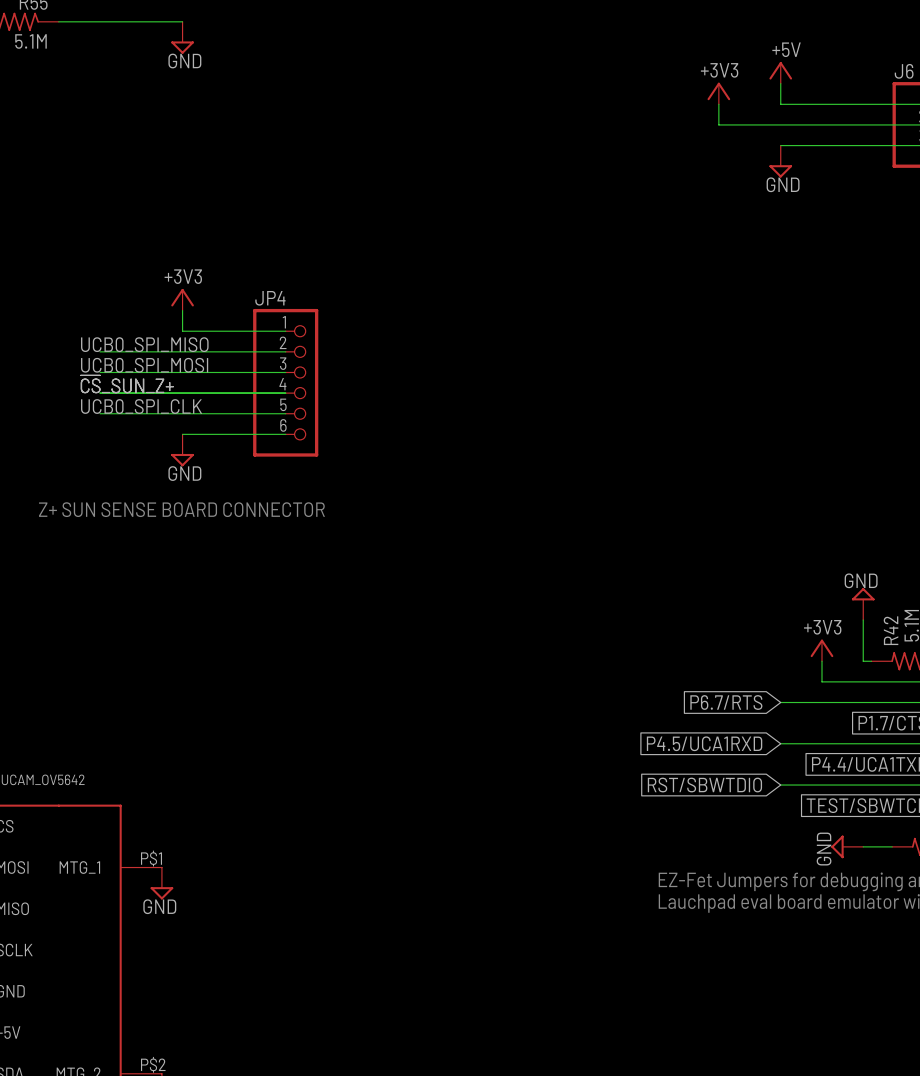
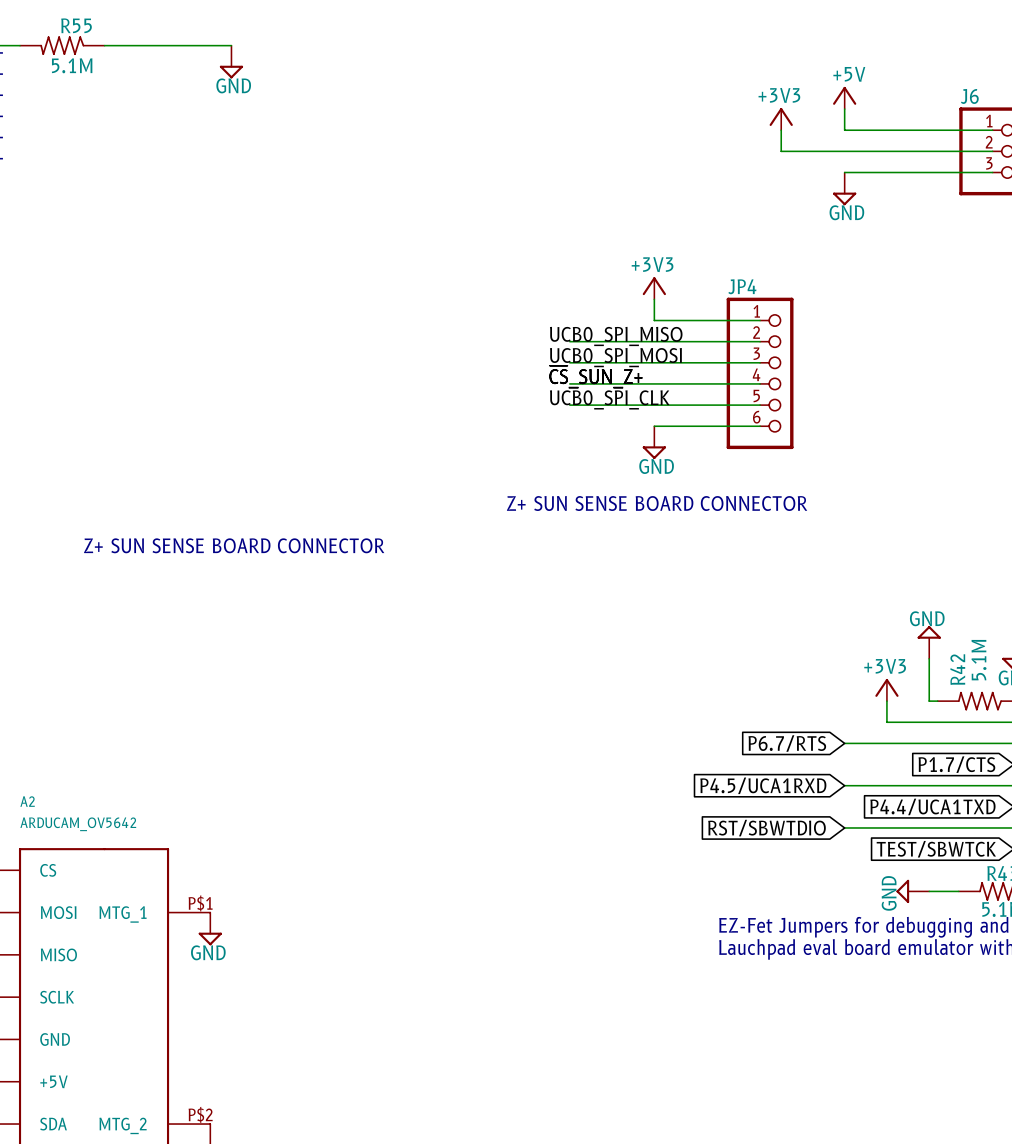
power symbol: none -> +3V3 (654, 288)
wire: none -> (654, 299) (654, 320) (760, 320)
power symbol: +3V3 (182, 299) -> none
label: none -> UCB0_SPI_MISO (616, 336)
wire: (182, 310) (182, 331) (285, 331) -> none
wire: none -> (569, 341) (760, 341)
label: none -> UCB0_SPI_MOSI (615, 357)
wire: none -> (569, 362) (760, 362)
label: none -> ~{CS}_SUN_Z+ (595, 377)
label: UCB0_SPI_MISO (144, 344) -> none
wire: (100, 351) (285, 351) -> none
wire: none -> (569, 383) (760, 383)
label: UCB0_SPI_MOSI (144, 365) -> none
label: none -> UCB0_SPI_CLK (609, 399)
wire: (100, 372) (285, 372) -> none
wire: none -> (569, 405) (760, 405)
JP4 position: (285, 382) -> (760, 373)
label: ~{CS}_SUN_Z+ (127, 384) -> none
wire: (100, 393) (285, 393) -> none
wire: none -> (654, 426) (760, 426)
label: UCB0_SPI_CLK (141, 406) -> none
power symbol: none -> GND (654, 442)
wire: (100, 413) (285, 413) -> none
wire: (182, 434) (285, 434) -> none
power symbol: GND (182, 450) -> none
text: none -> Z+ SUN SENSE BOARD CONNECTOR (657, 503)

